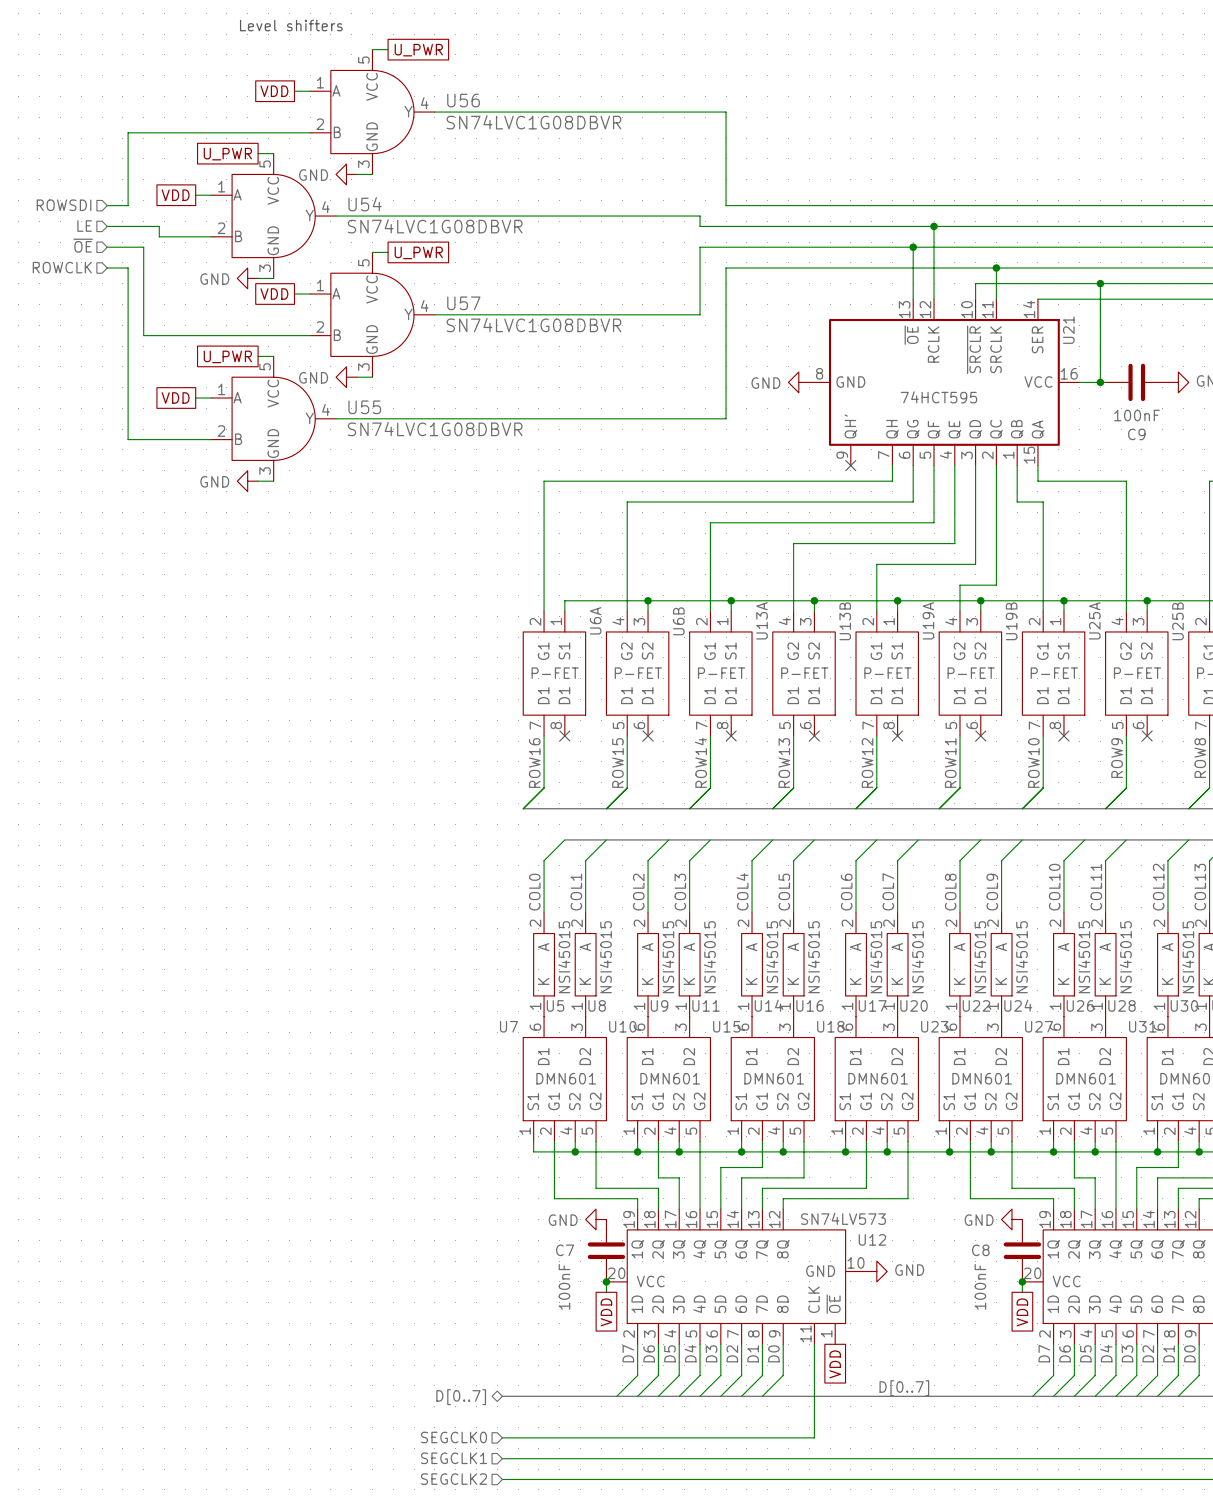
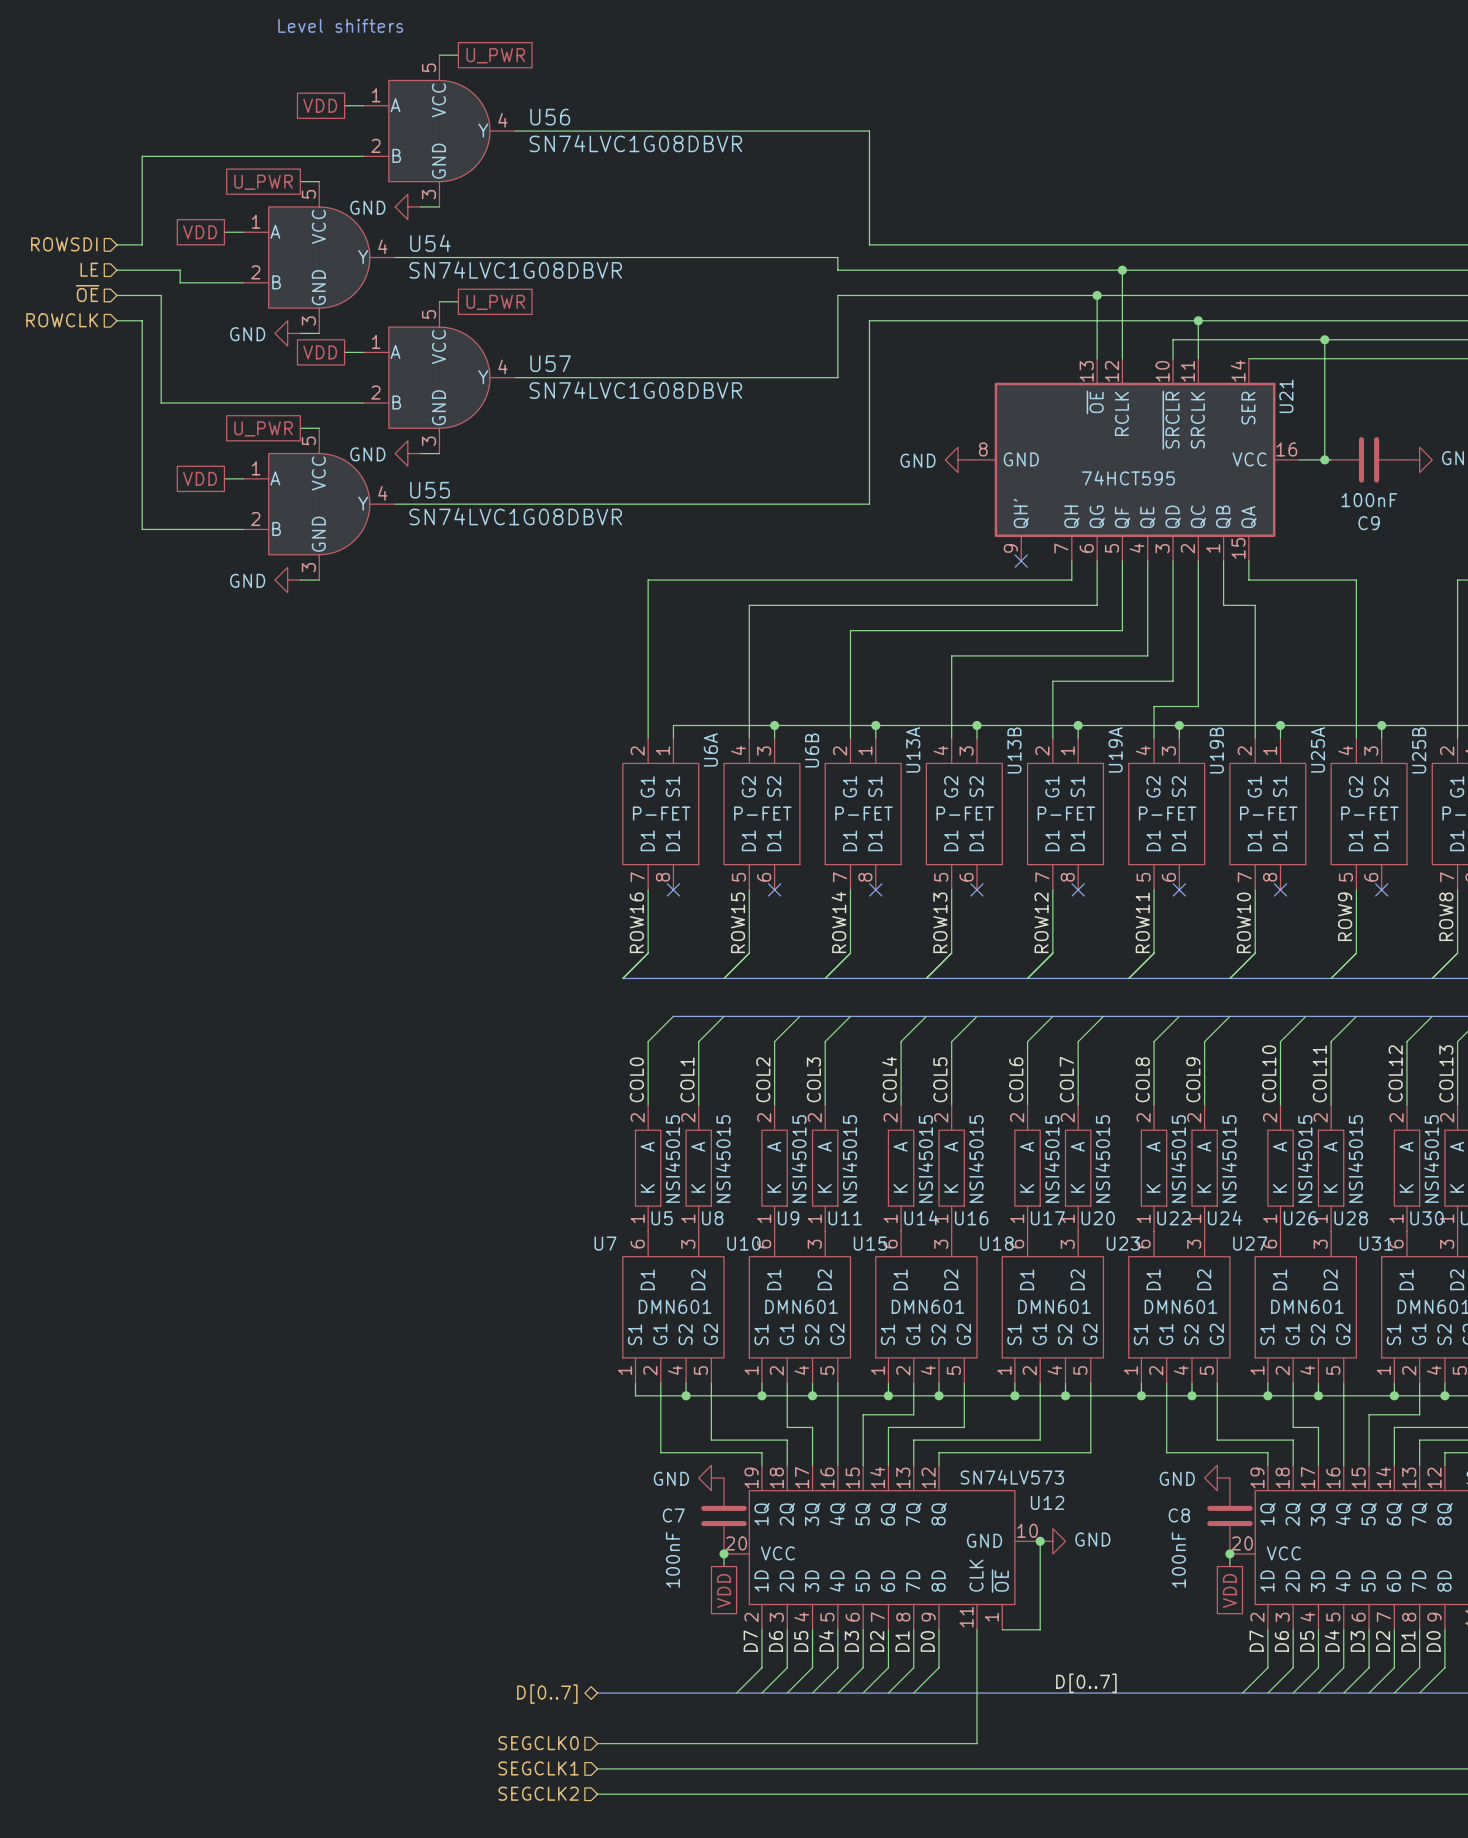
wire: none -> (1040, 1541) (1040, 1629) (1002, 1629)
junction: none -> (1040, 1541)
global label: VDD (835, 1364) -> none

